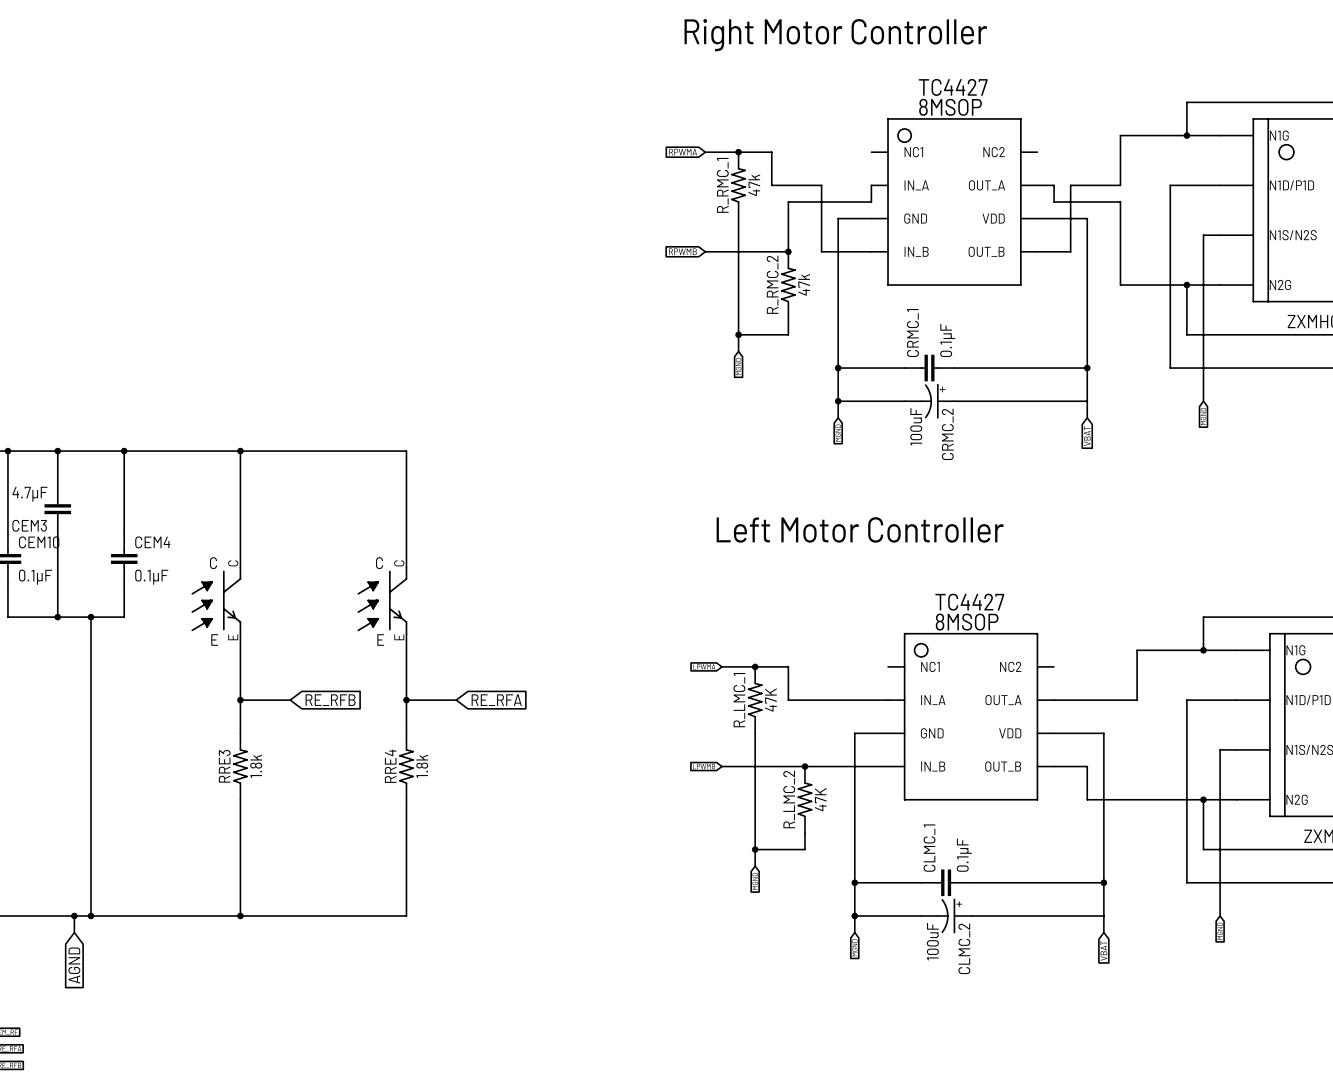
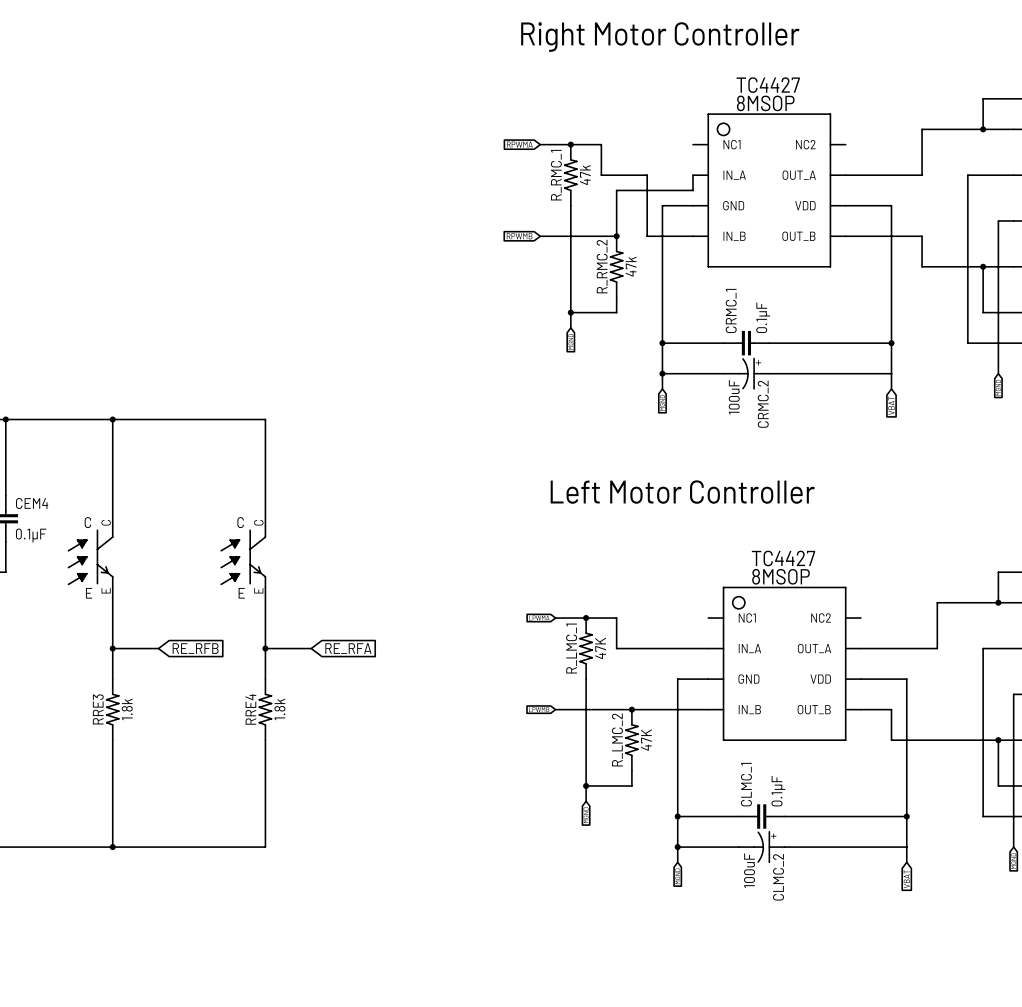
wire: (1054, 185) (1054, 201) (1120, 201) (1120, 251) -> (876, 236) (922, 236)
wire: (1070, 185) (1070, 251) -> (876, 175) (860, 175)

